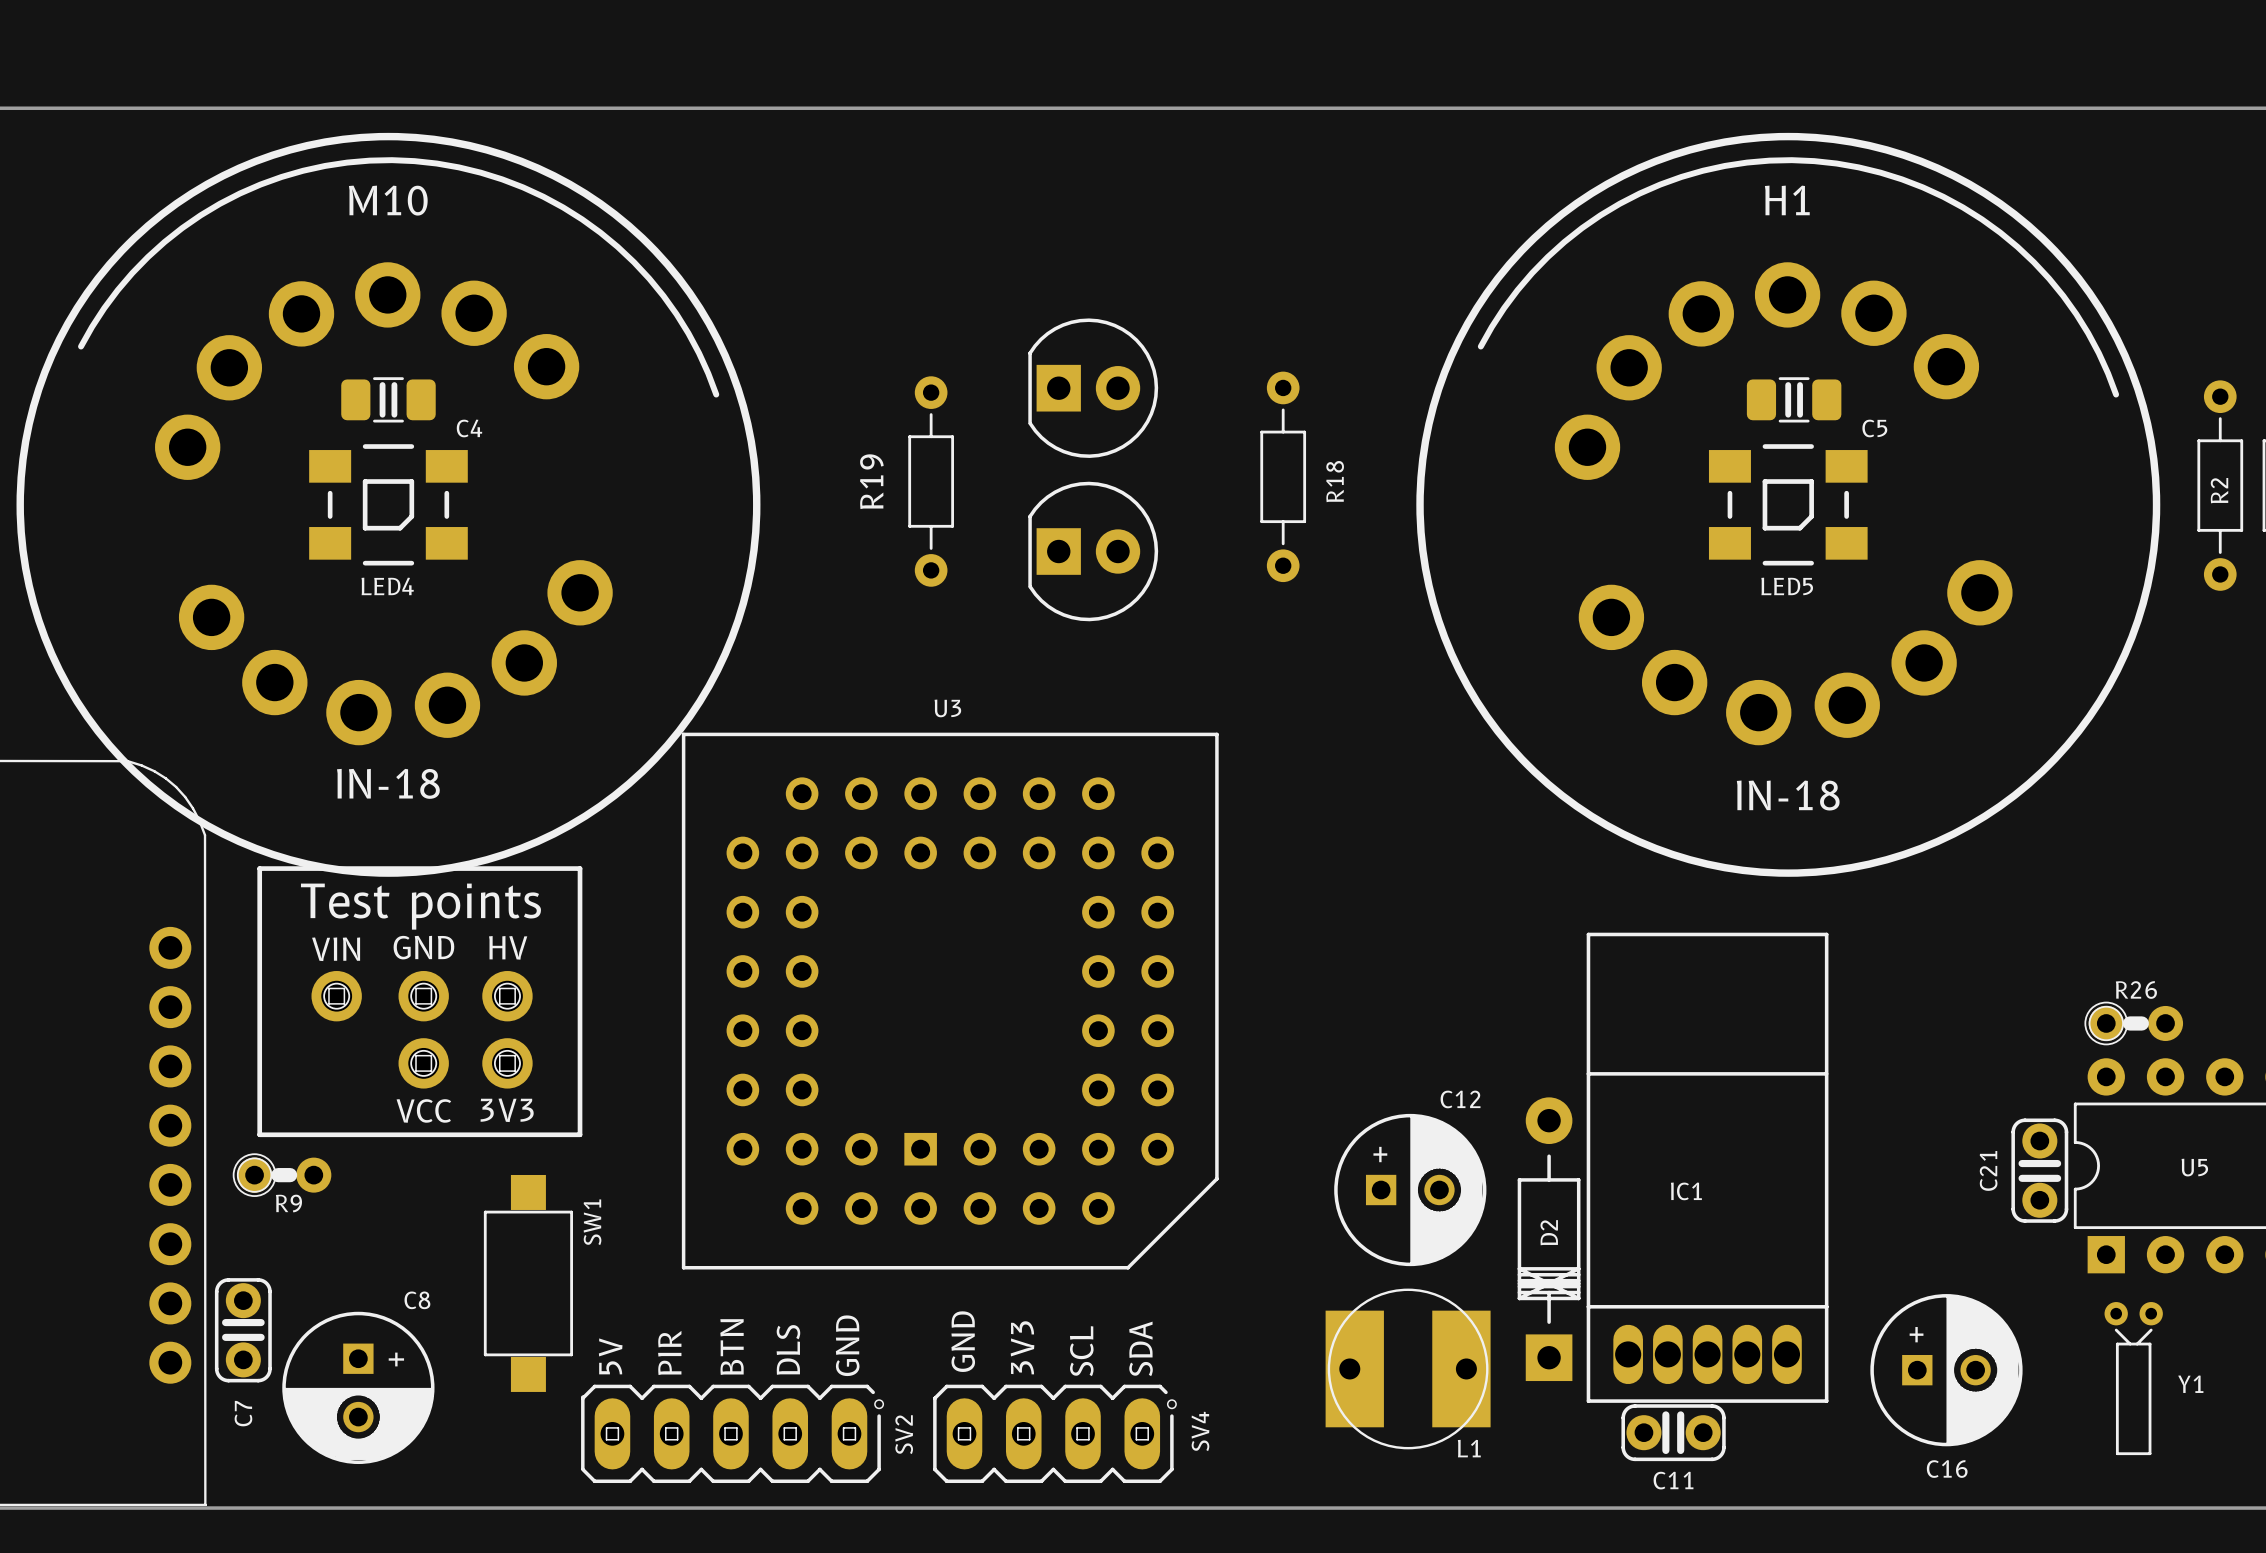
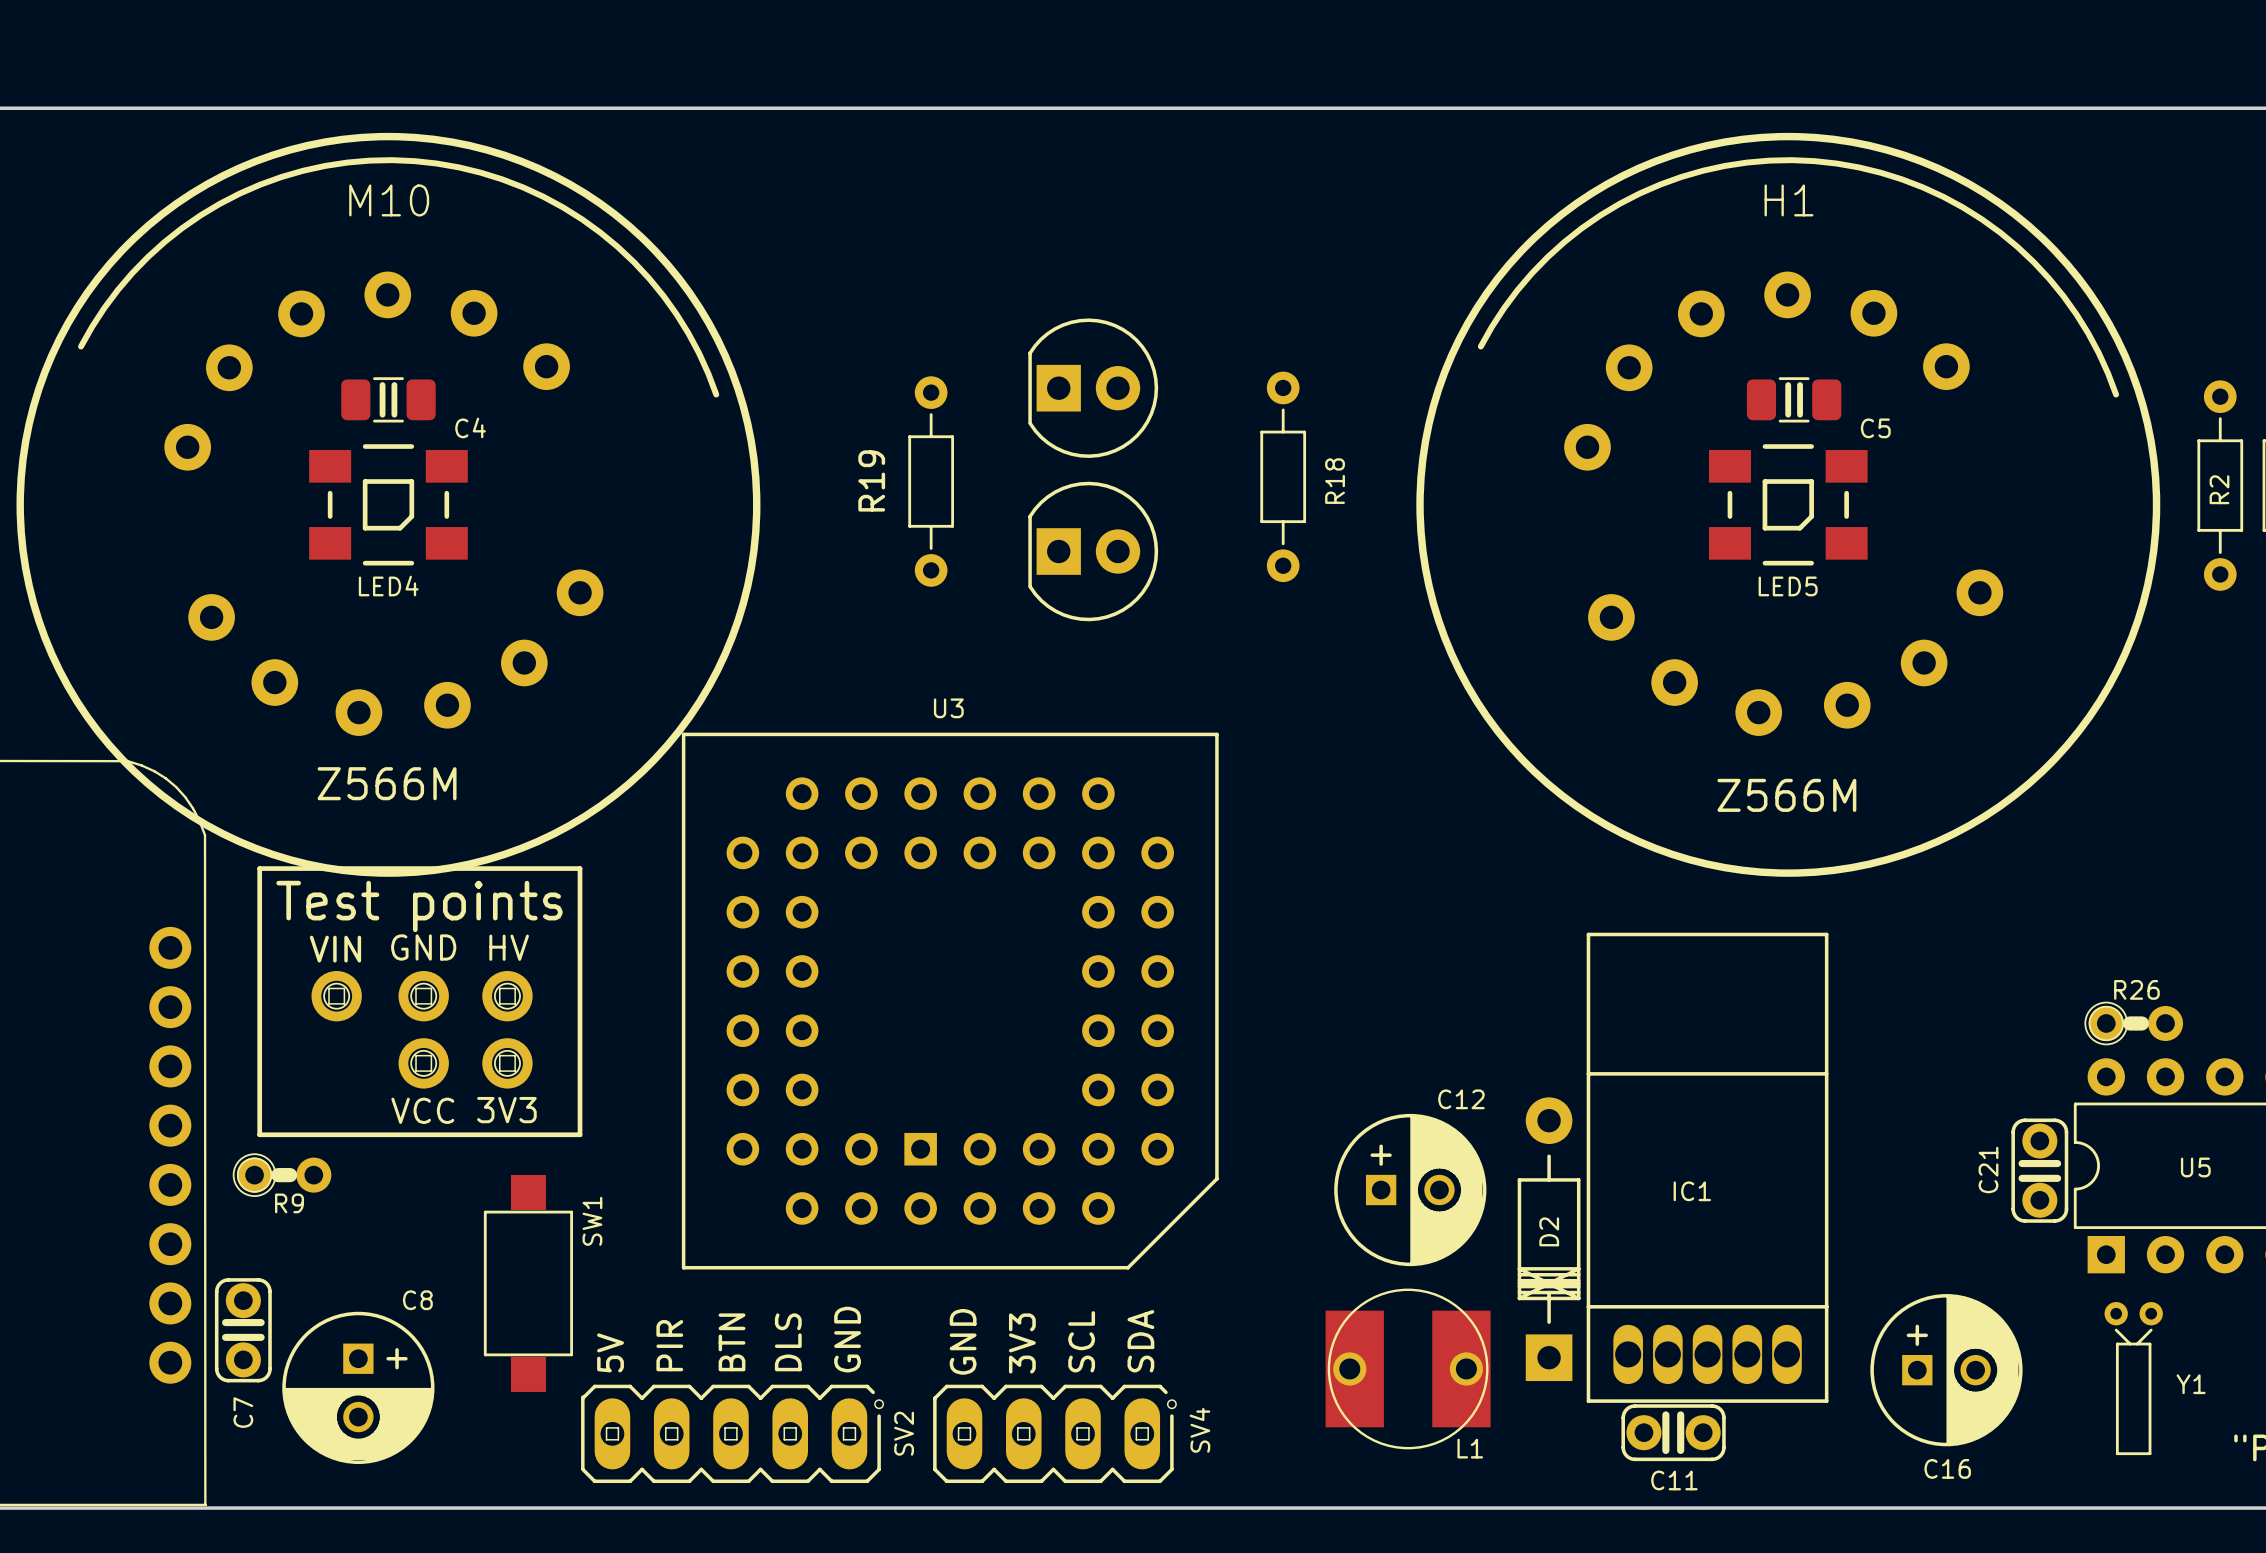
M10 footprint: [16, 132, 761, 877] -> [16, 132, 761, 877]
H1 footprint: [1416, 132, 2161, 877] -> [1416, 132, 2161, 877]
M10 value: IN-18 (388, 783) -> Z566M (387, 783)
H1 value: IN-18 (1788, 795) -> Z566M (1786, 795)

